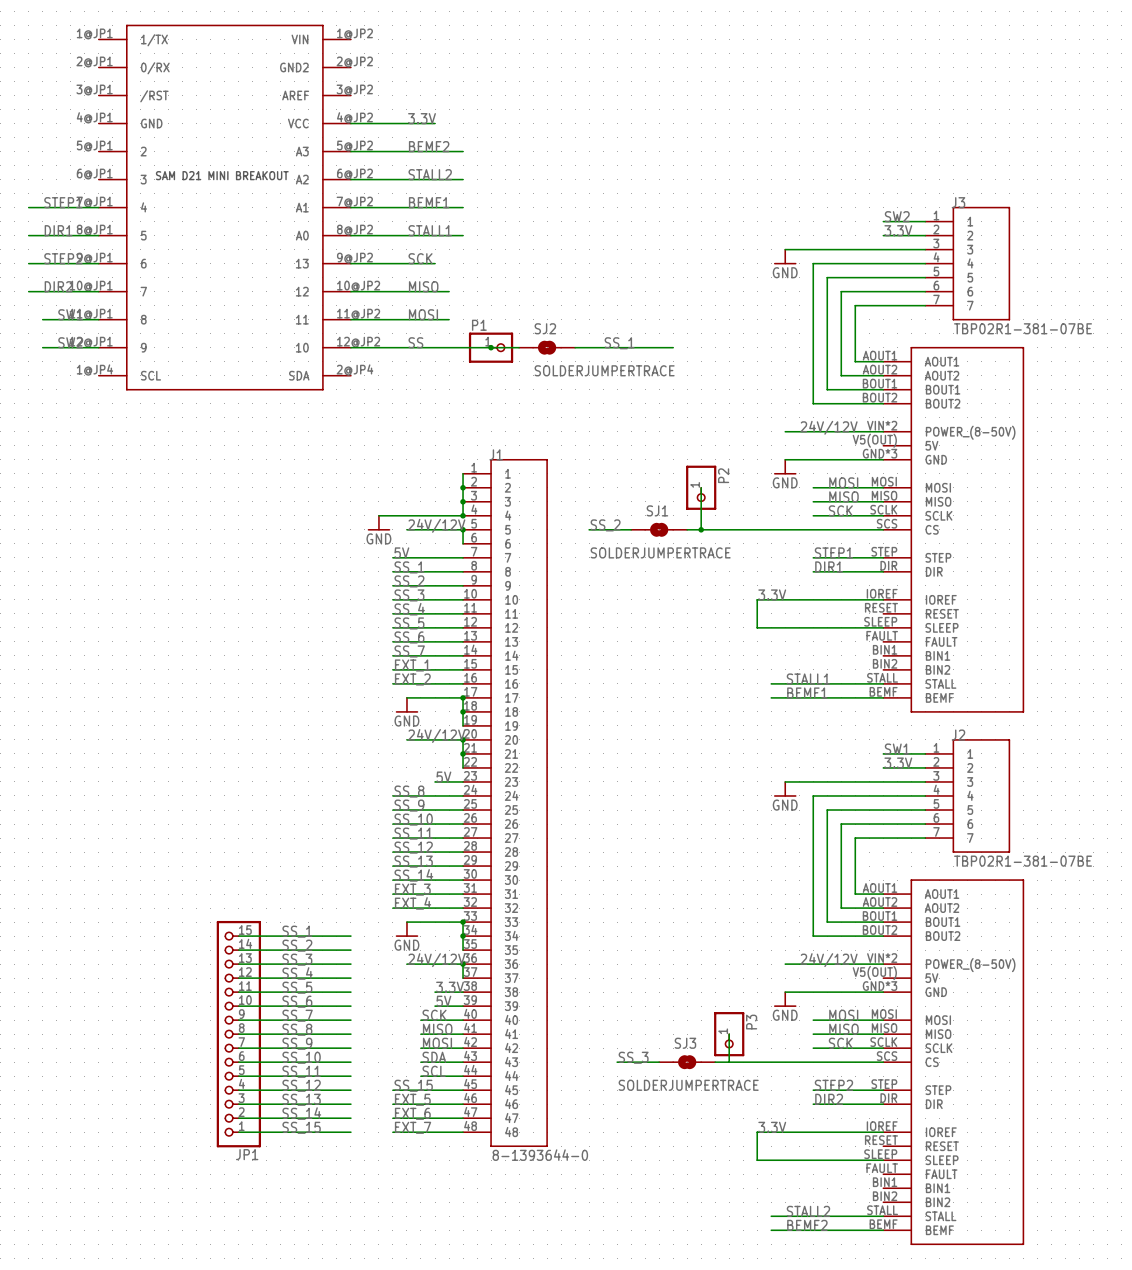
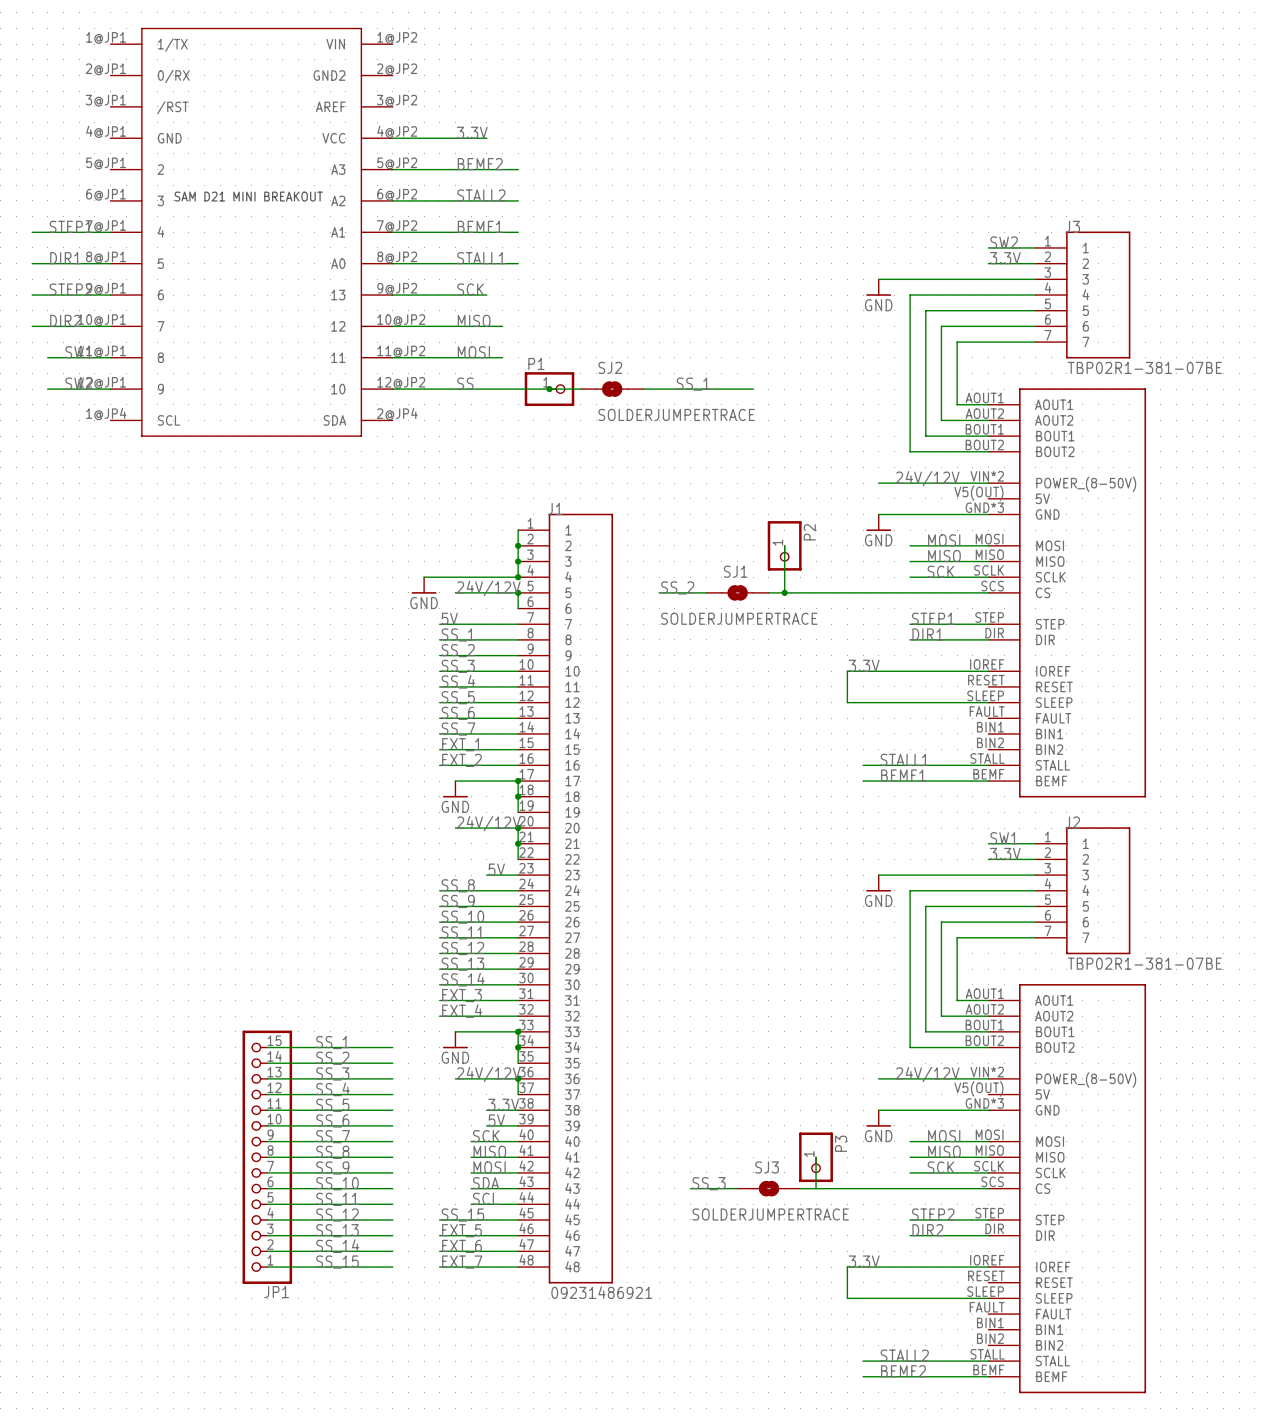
J1 value: 8-1393644-0 (540, 1155) -> 09231486921 (601, 1292)

